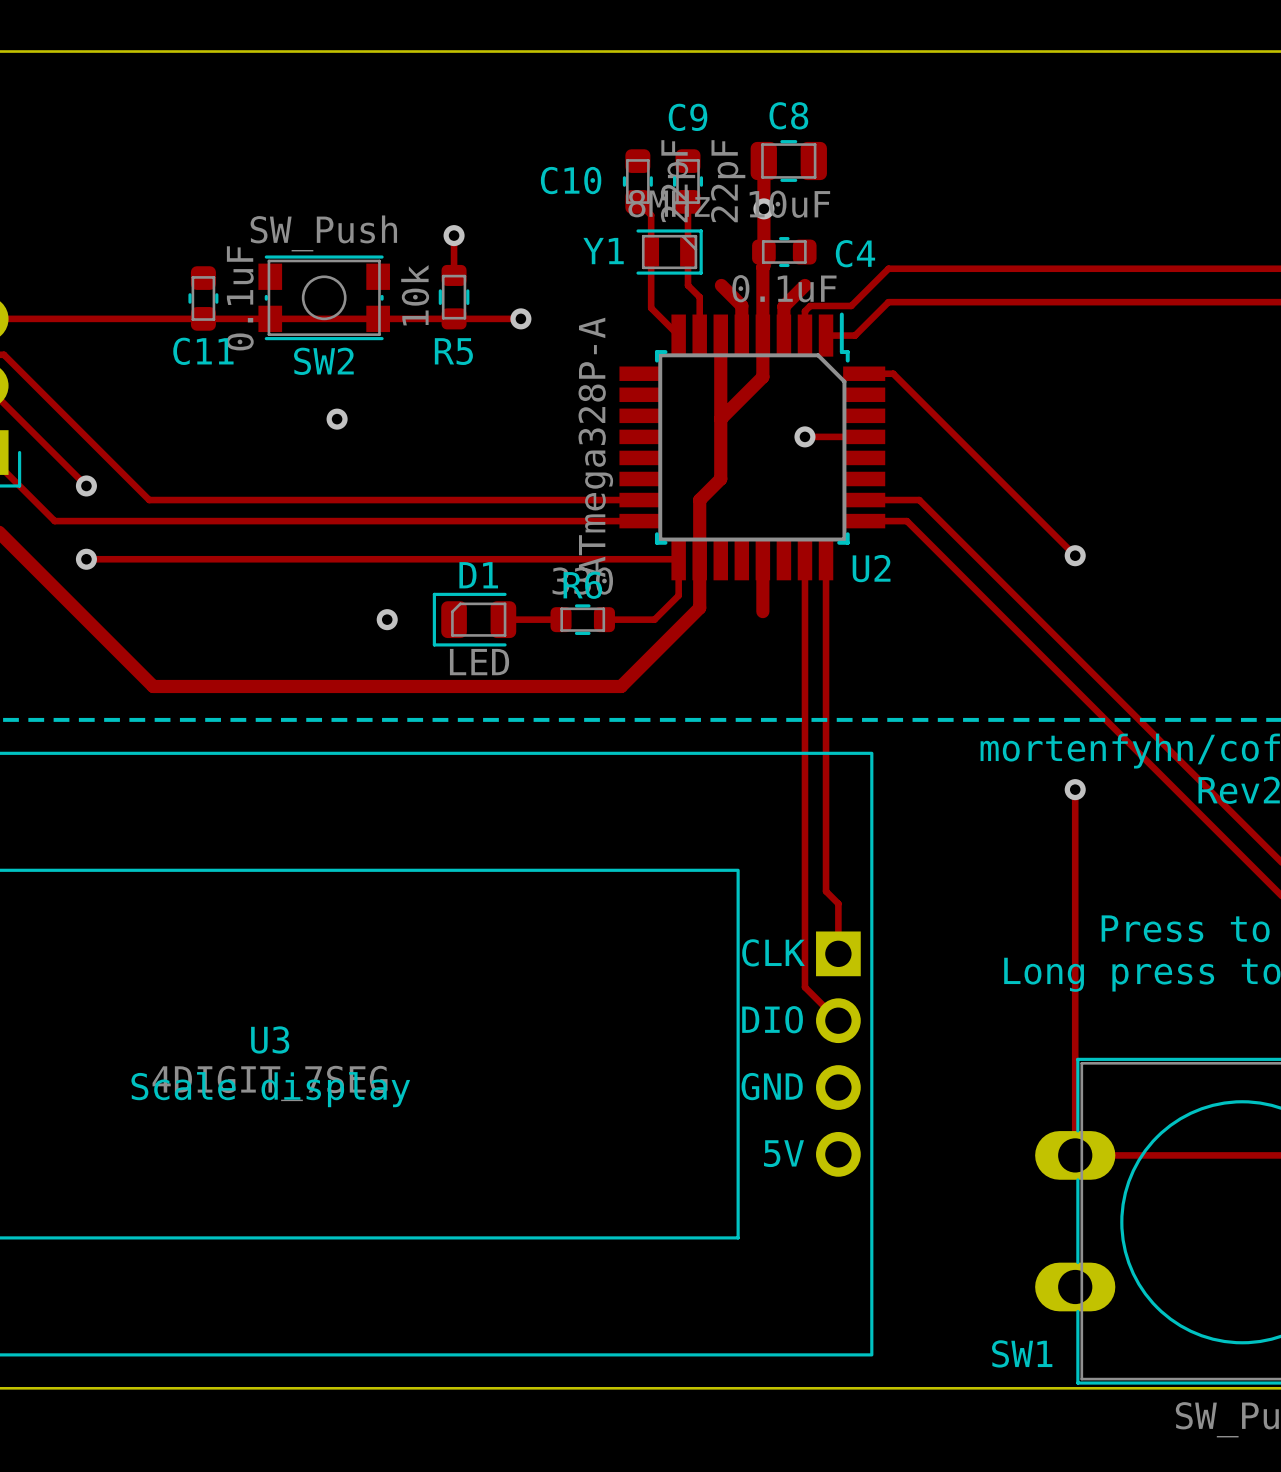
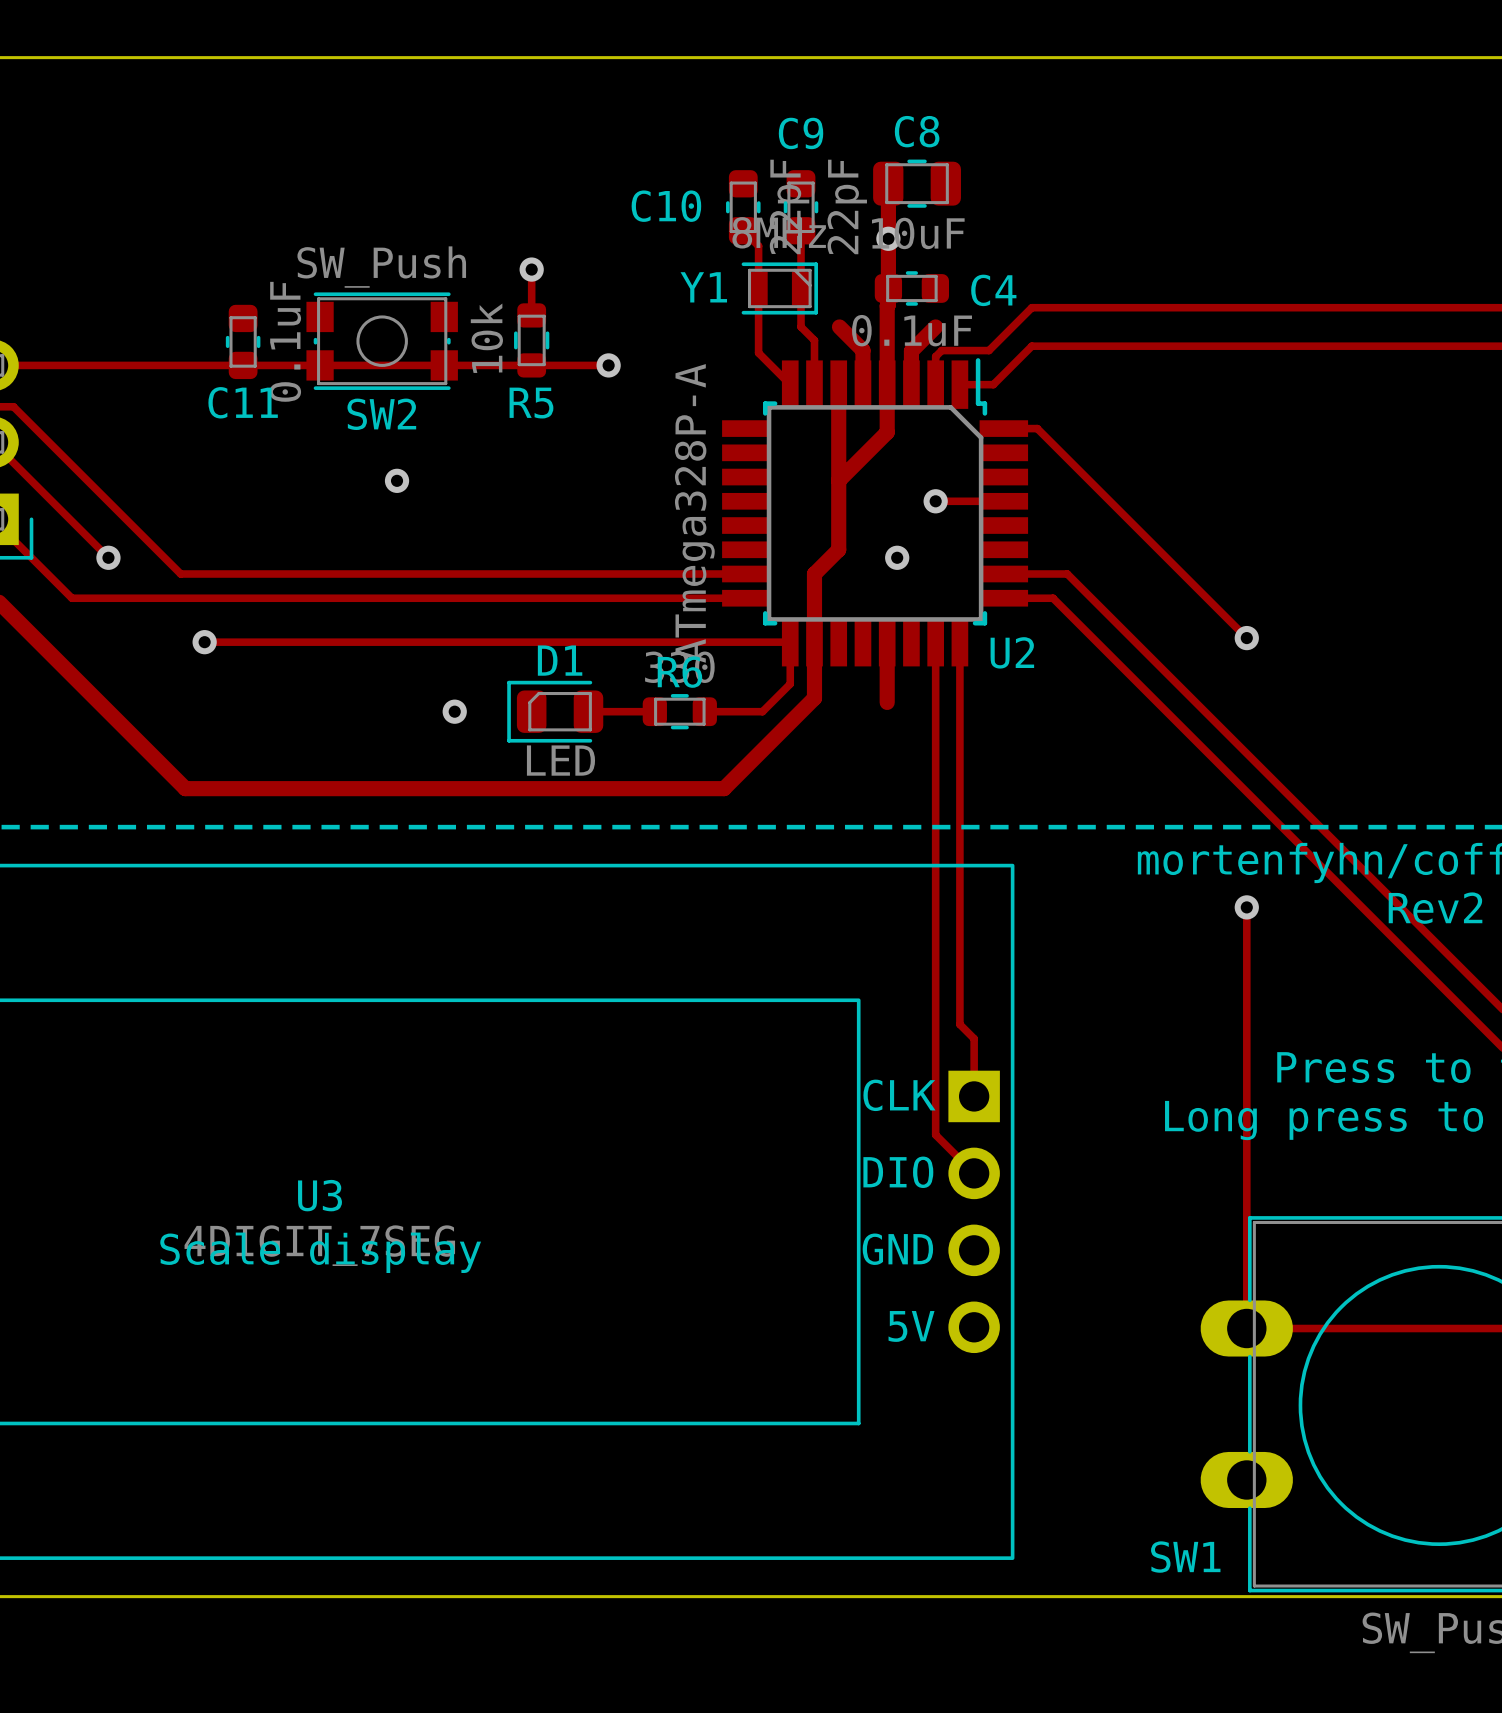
via: none -> (897, 557)
track: (86, 559) (169, 559) -> none
via position: (86, 559) -> (204, 642)

